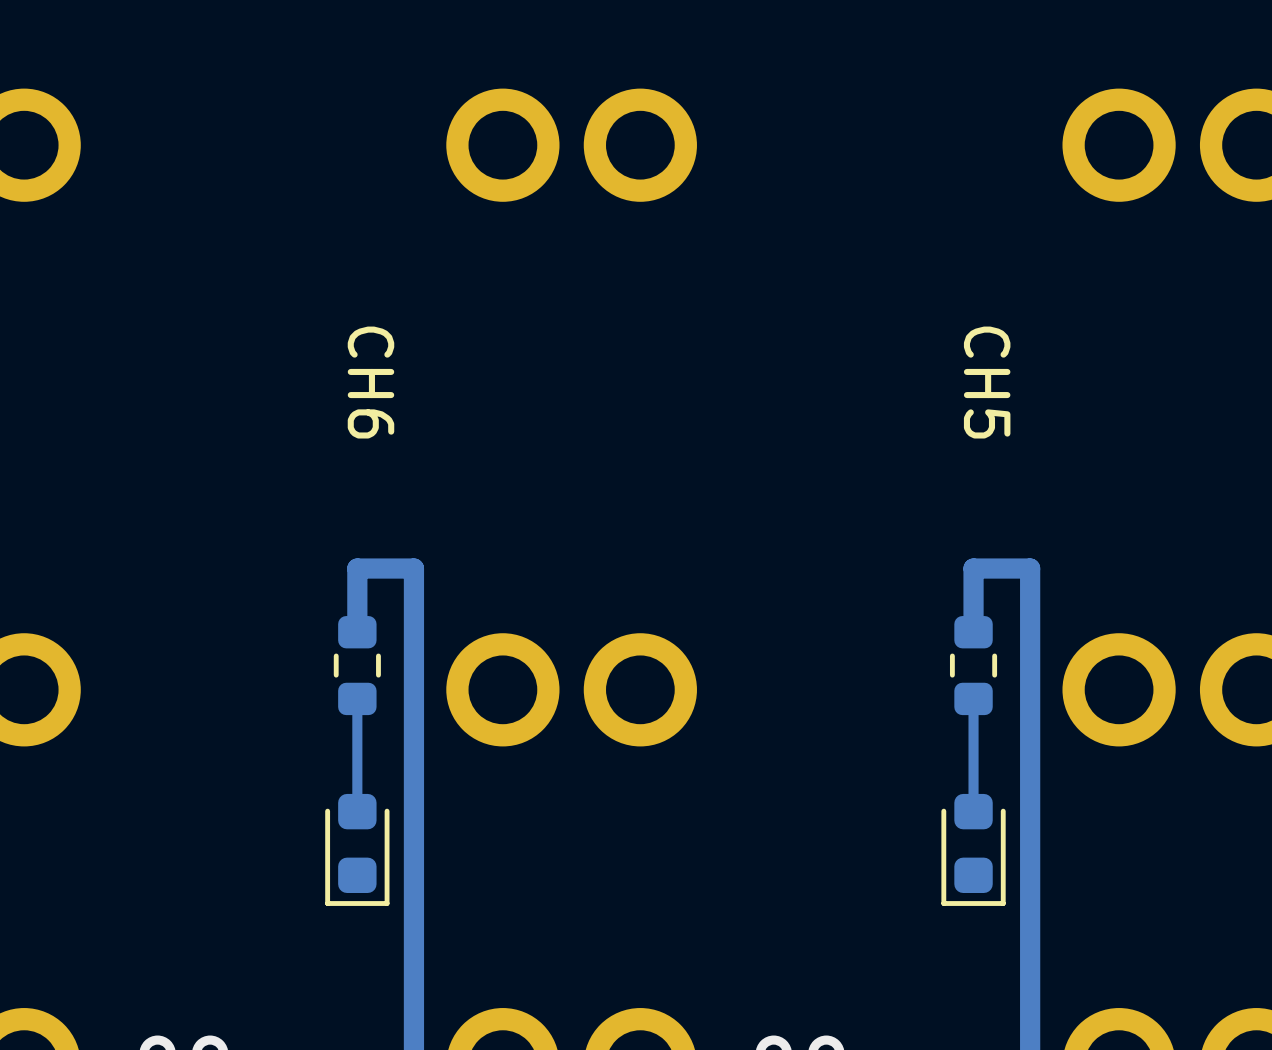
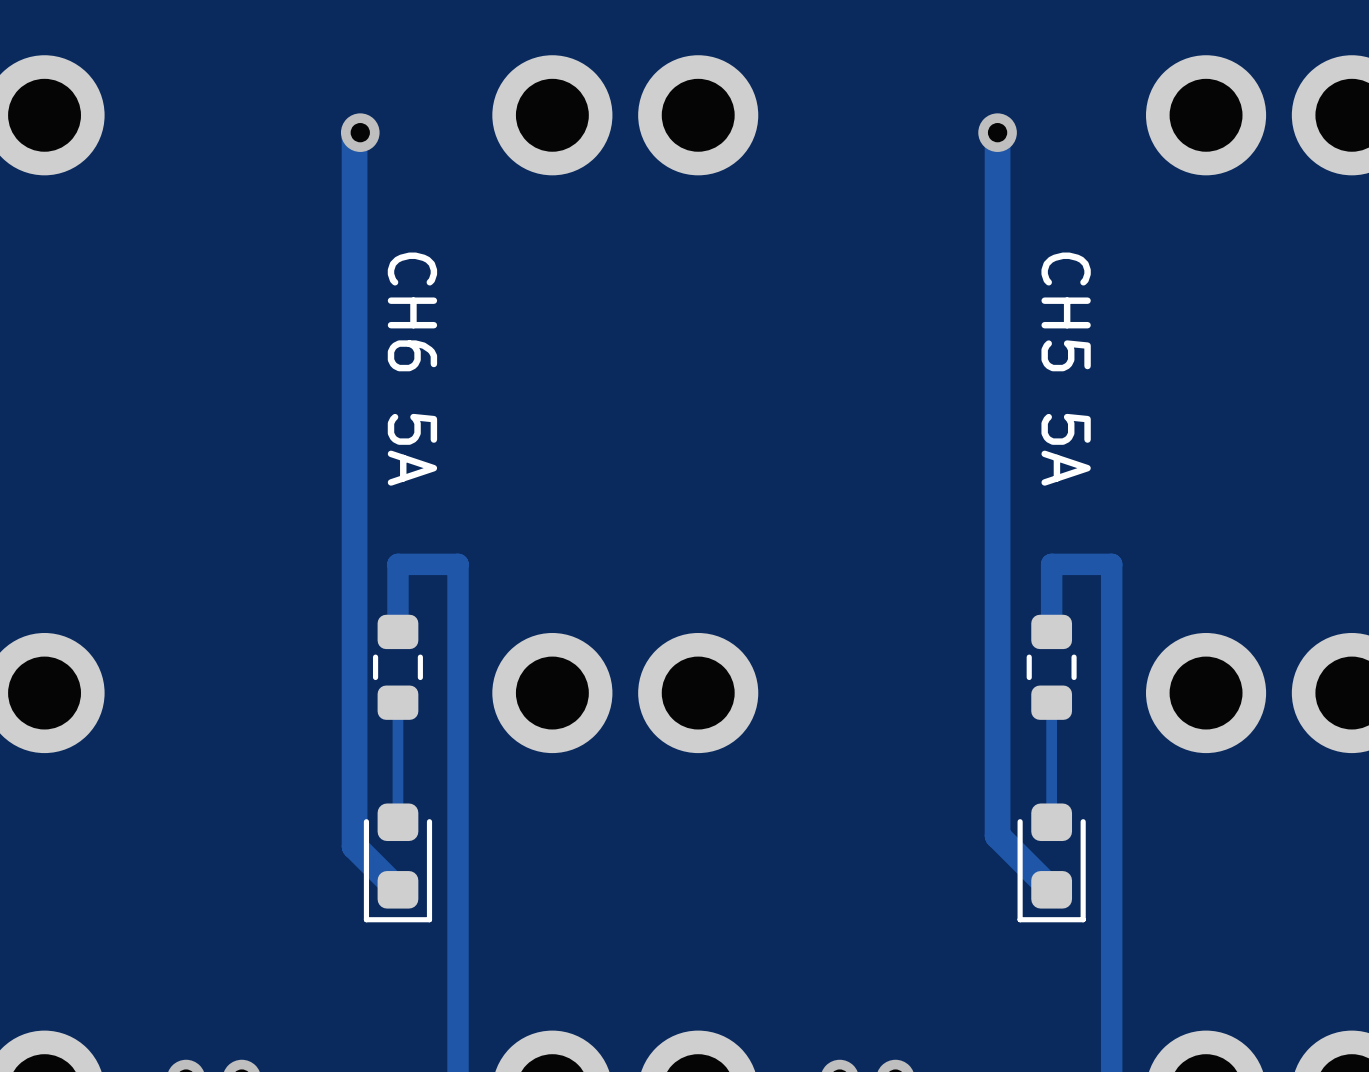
track: none -> (360, 132) (354, 138) (354, 846) (397, 889)
via: none -> (360, 132)
track: none -> (997, 132) (997, 835) (1051, 889)
via: none -> (997, 132)
text: CH6 (370, 382) -> CH6 5A (412, 369)
text: CH5 (987, 382) -> CH5 5A (1066, 369)

